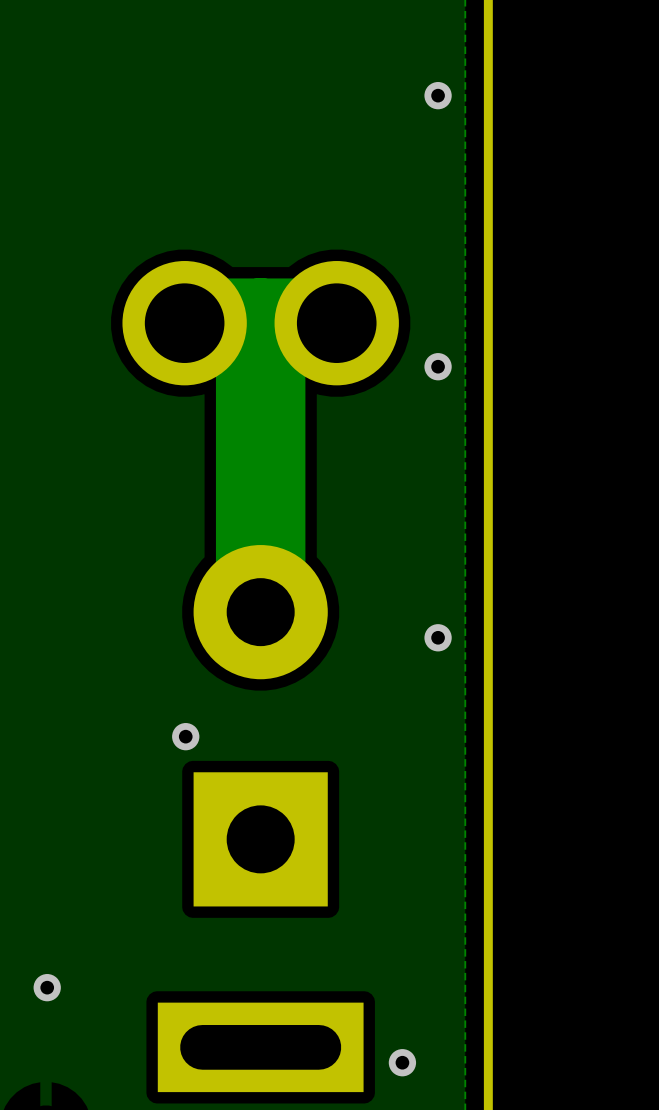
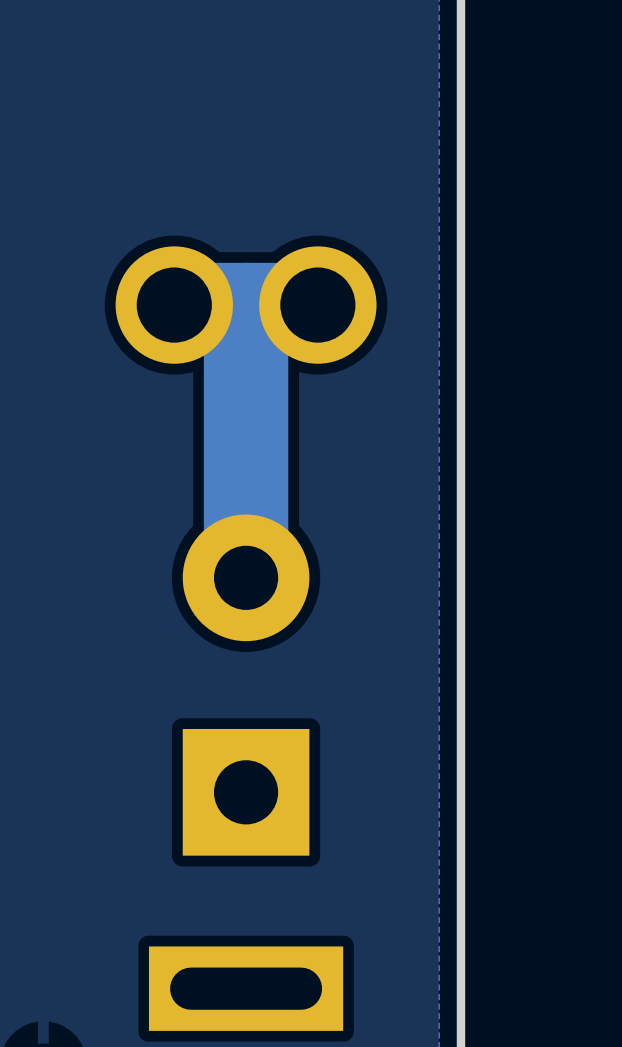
via: (438, 95) -> none
via: (438, 366) -> none
via: (438, 637) -> none
via: (185, 736) -> none
via: (47, 987) -> none
via: (402, 1062) -> none

